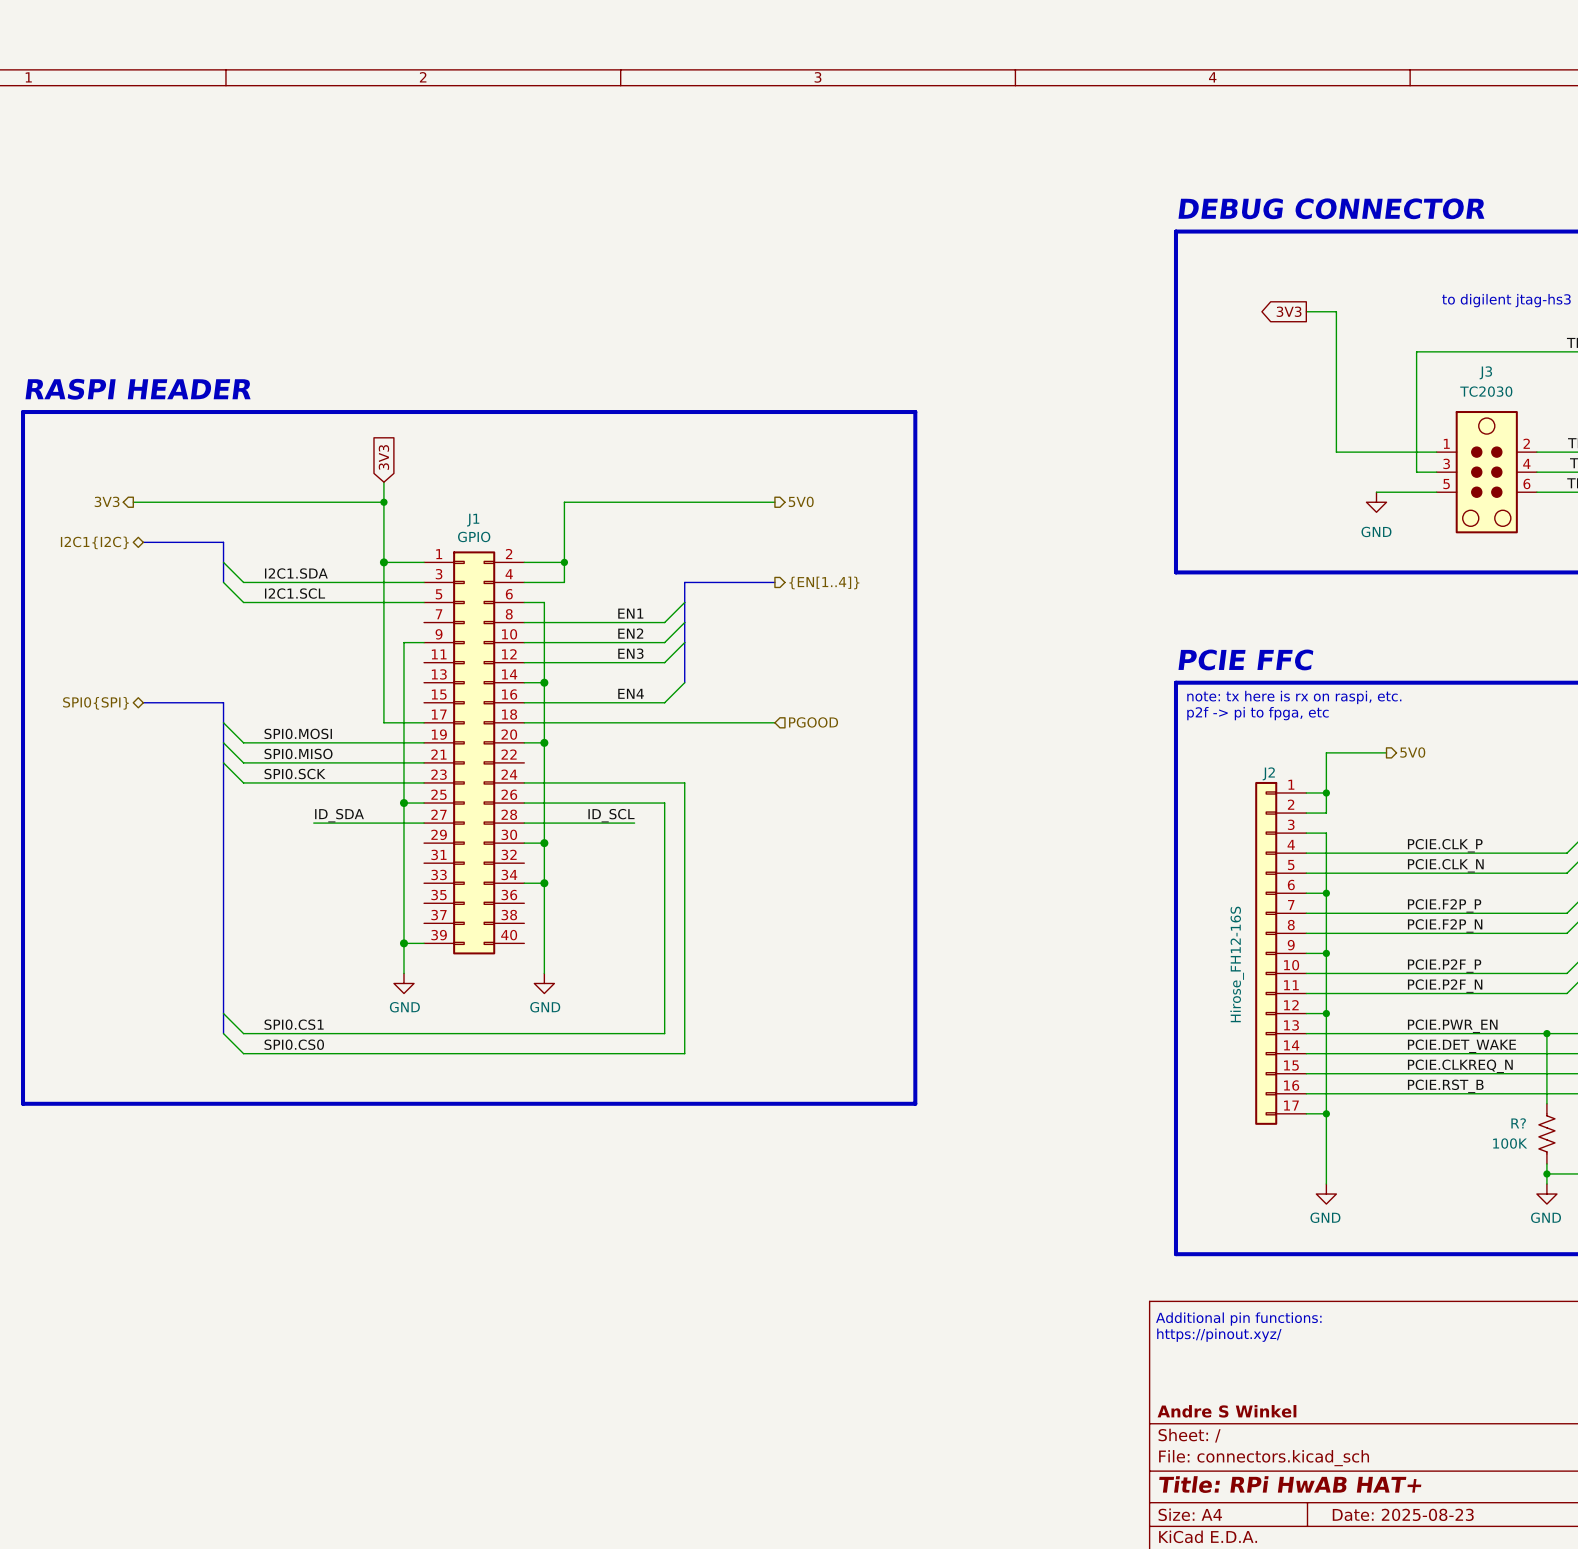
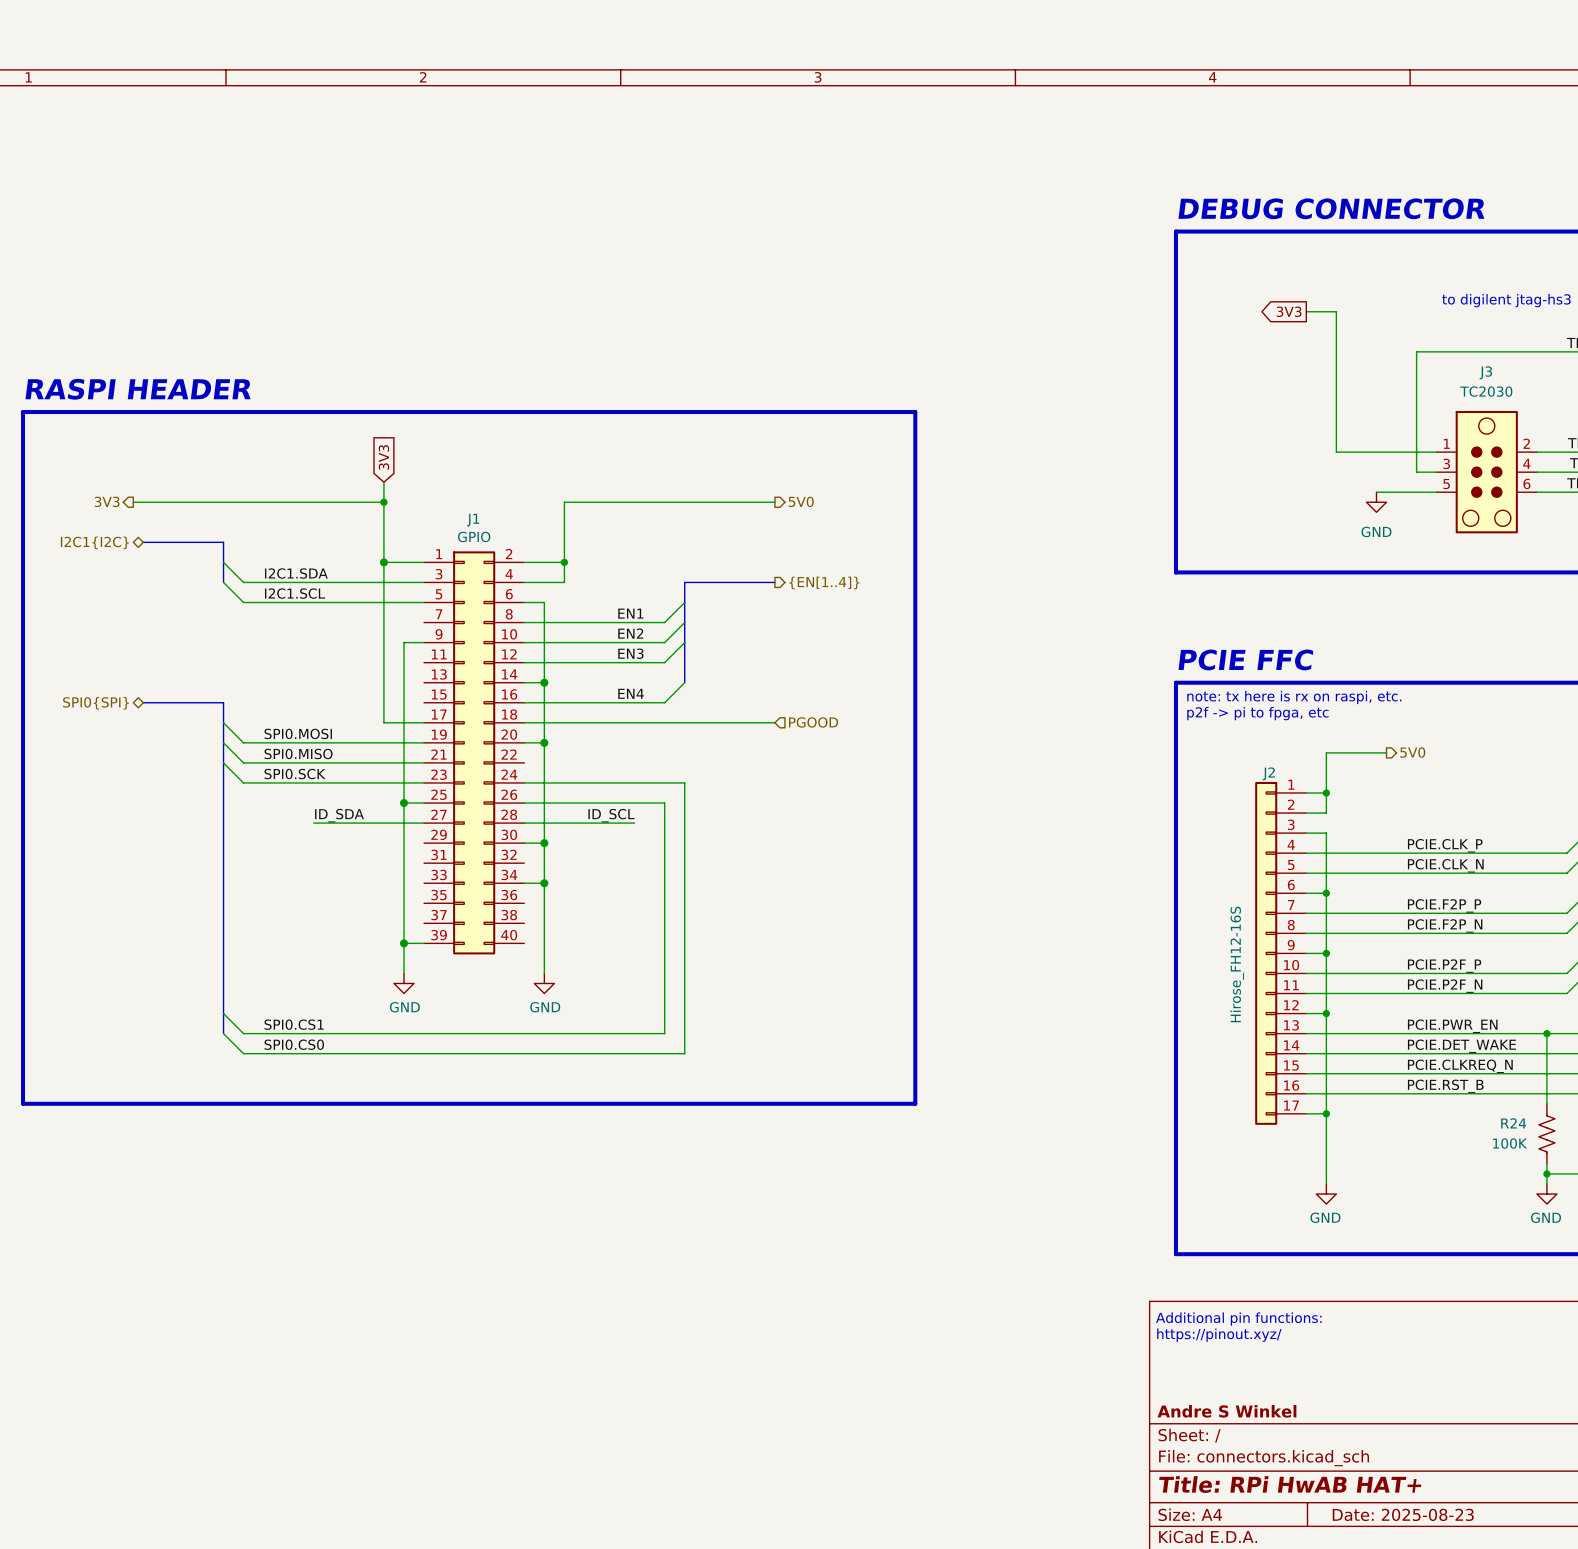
R? name: R? (1518, 1123) -> R24 (1513, 1123)

